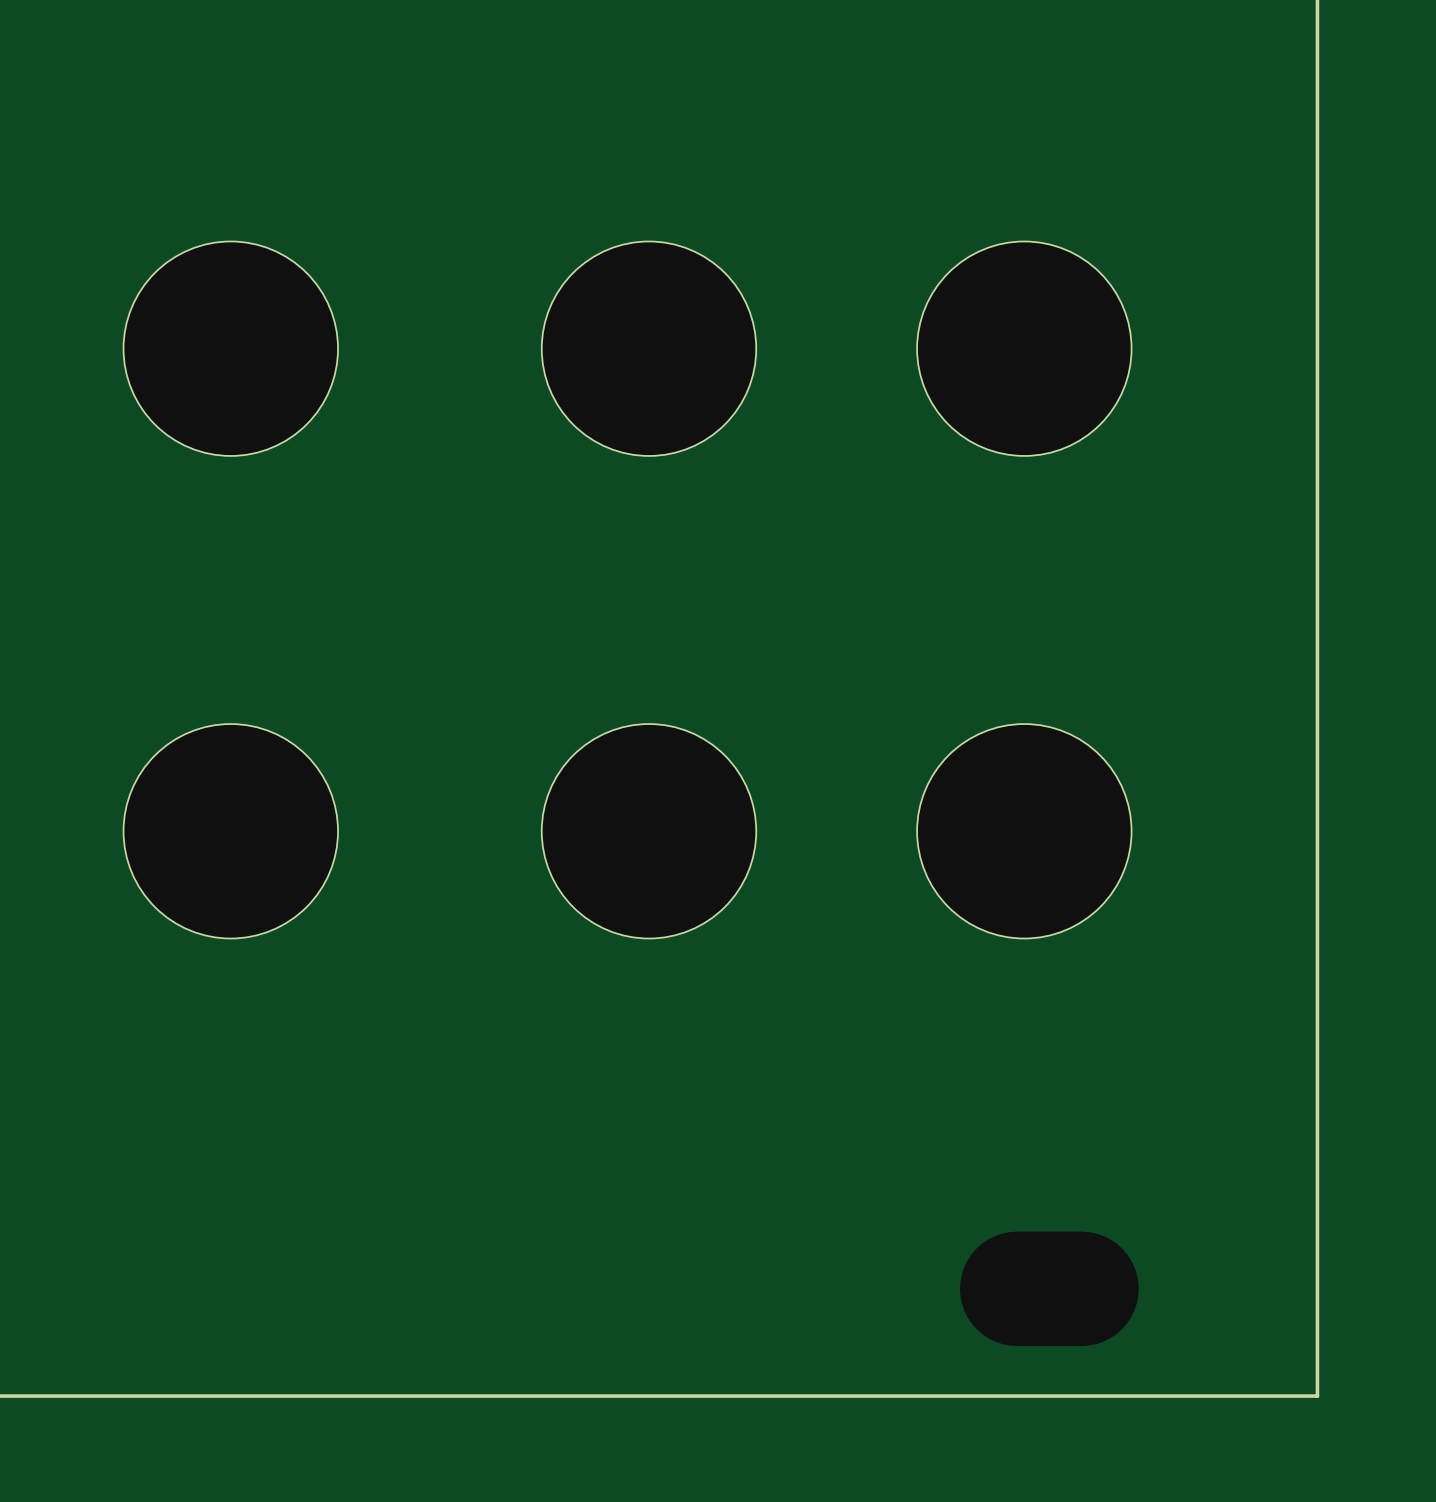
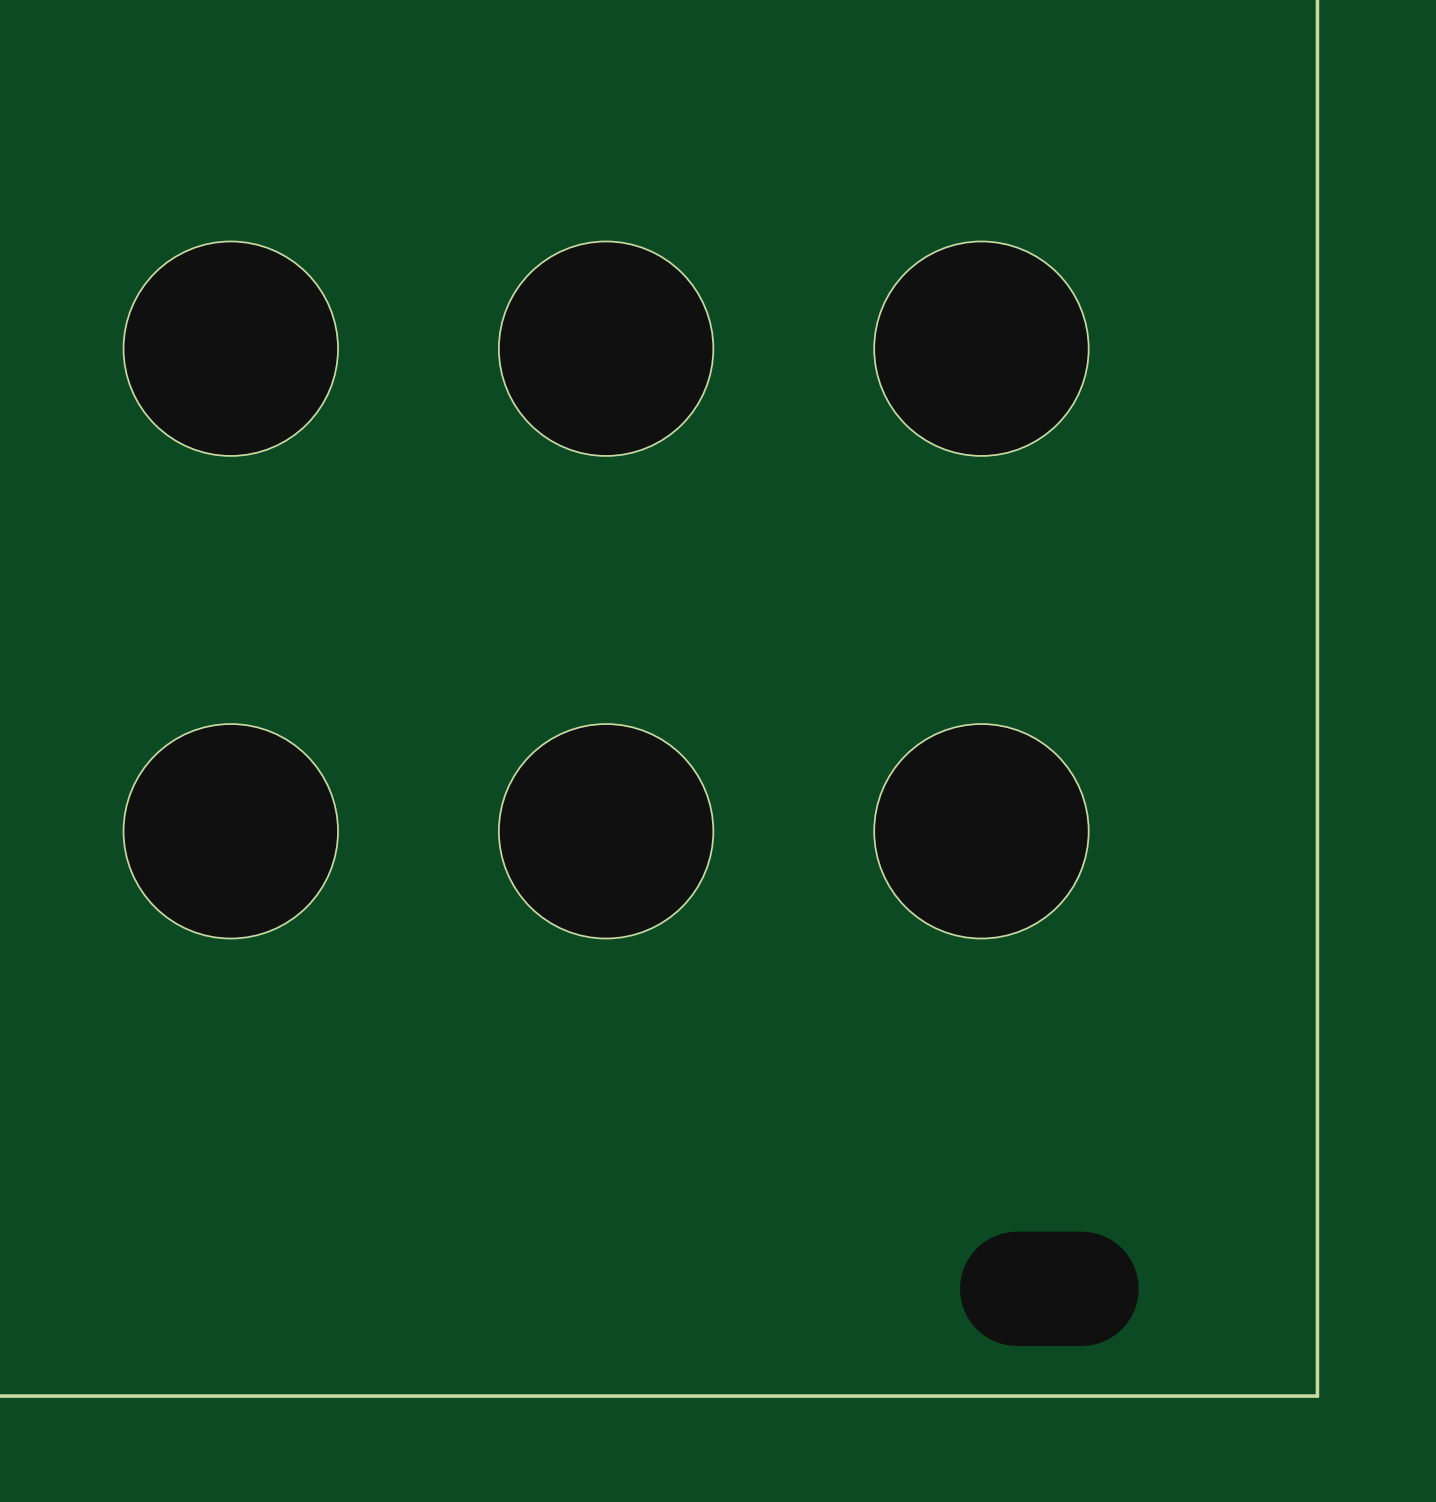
part position: (649, 348) -> (606, 348)
part position: (1024, 348) -> (981, 348)
part position: (649, 831) -> (606, 831)
part position: (1024, 831) -> (981, 831)

